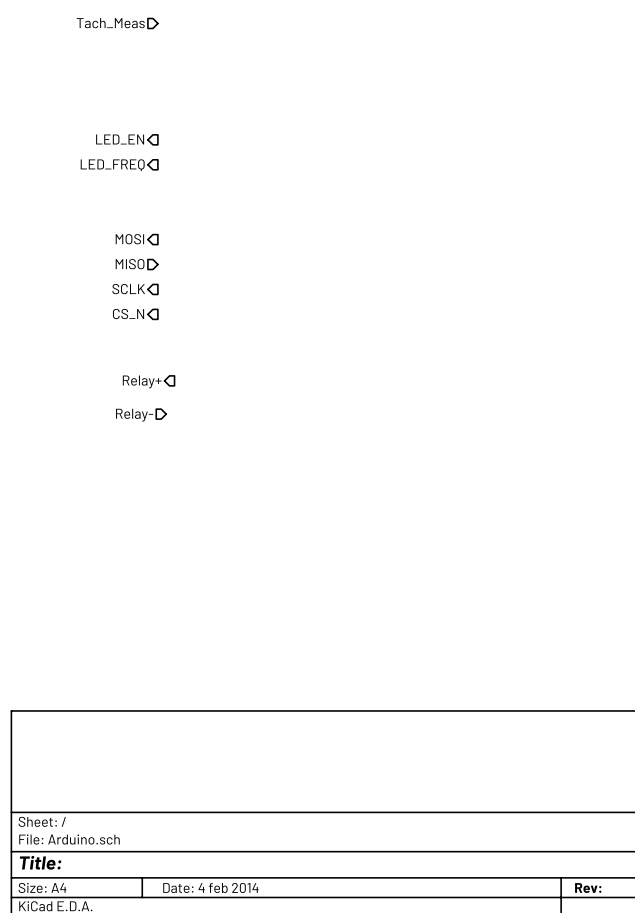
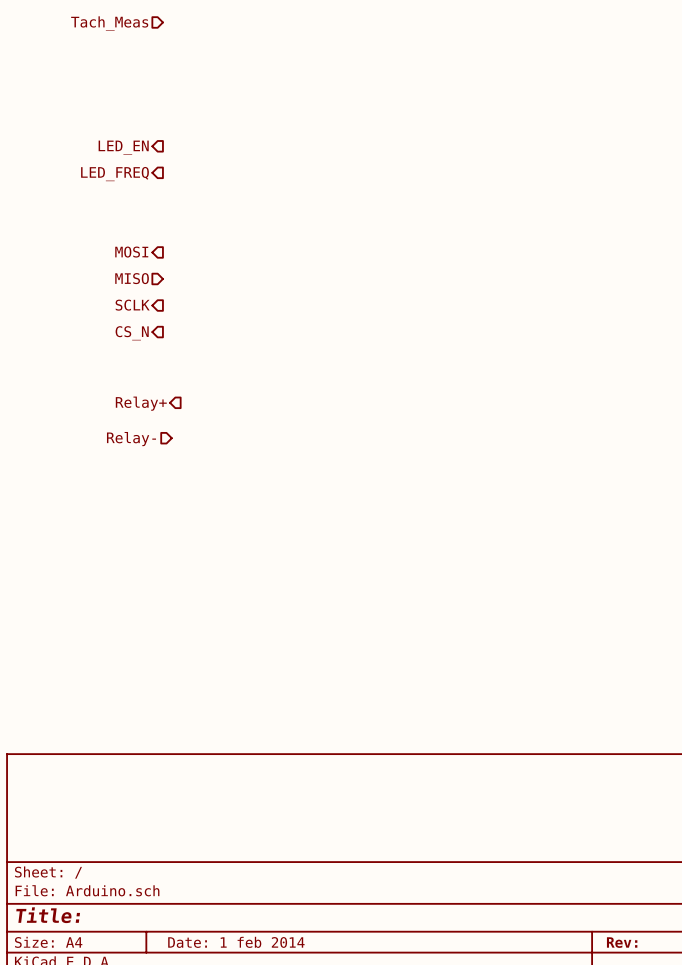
title block: Date: 4 feb 2014 (210, 887) -> Date: 1 feb 2014 (236, 942)

